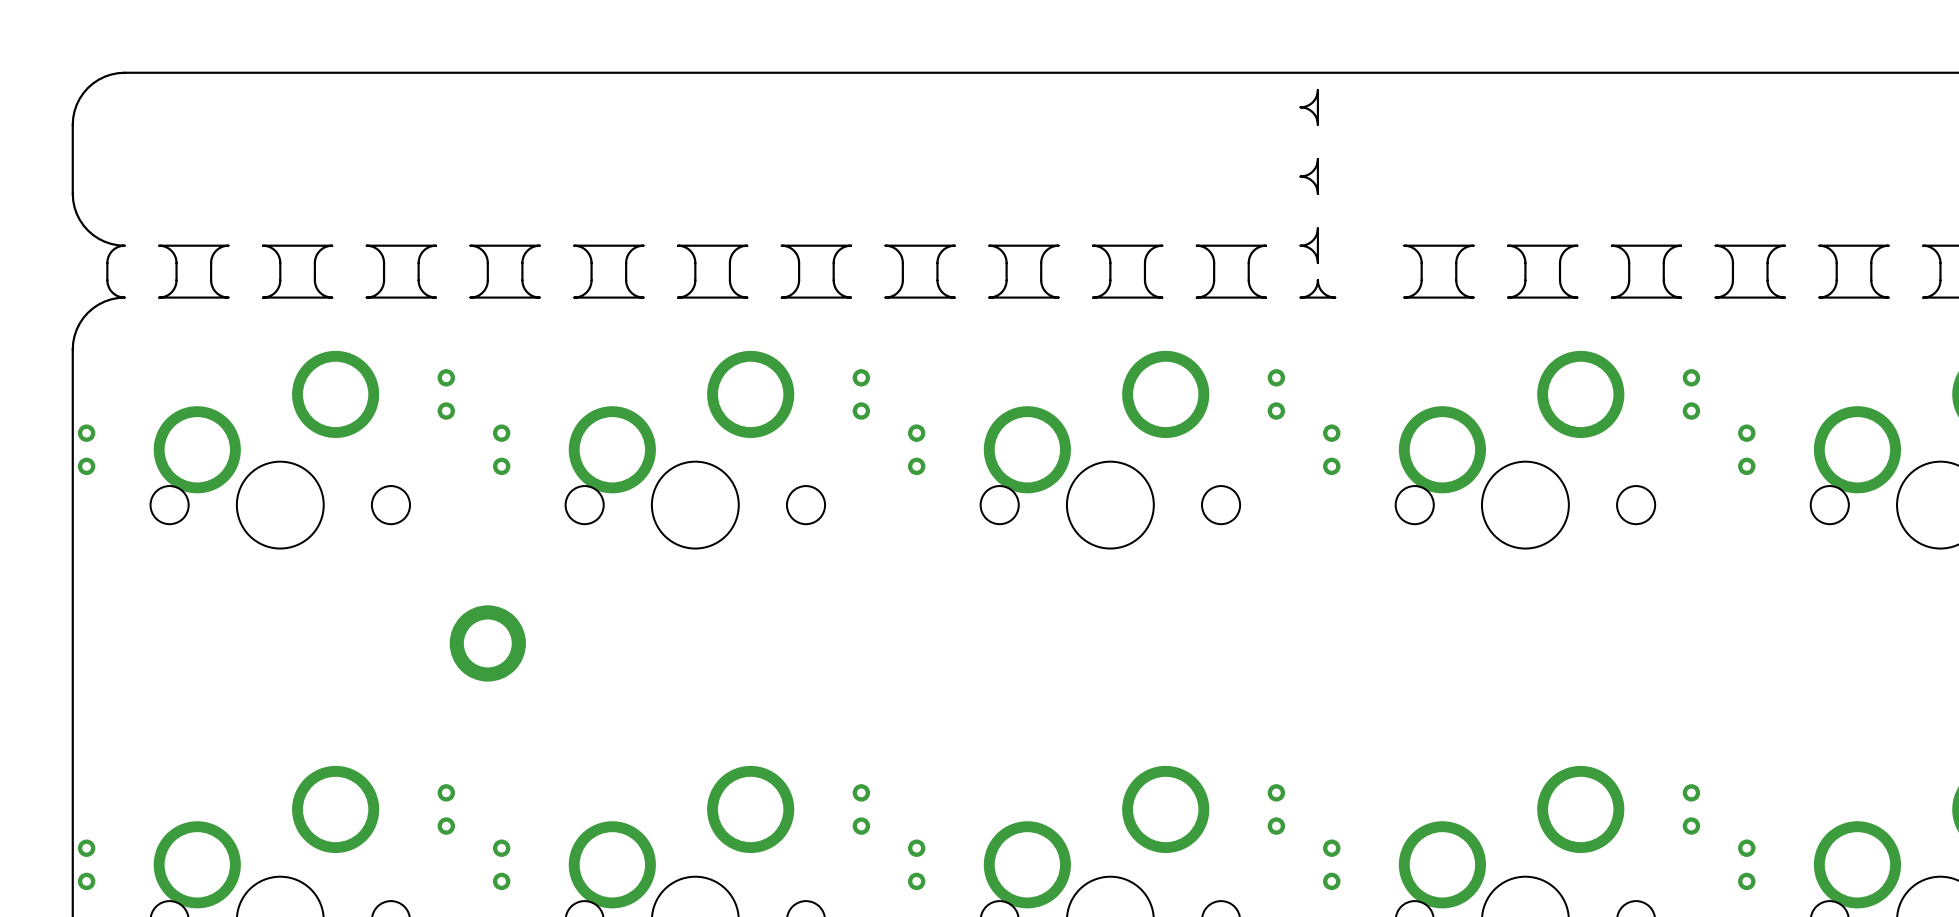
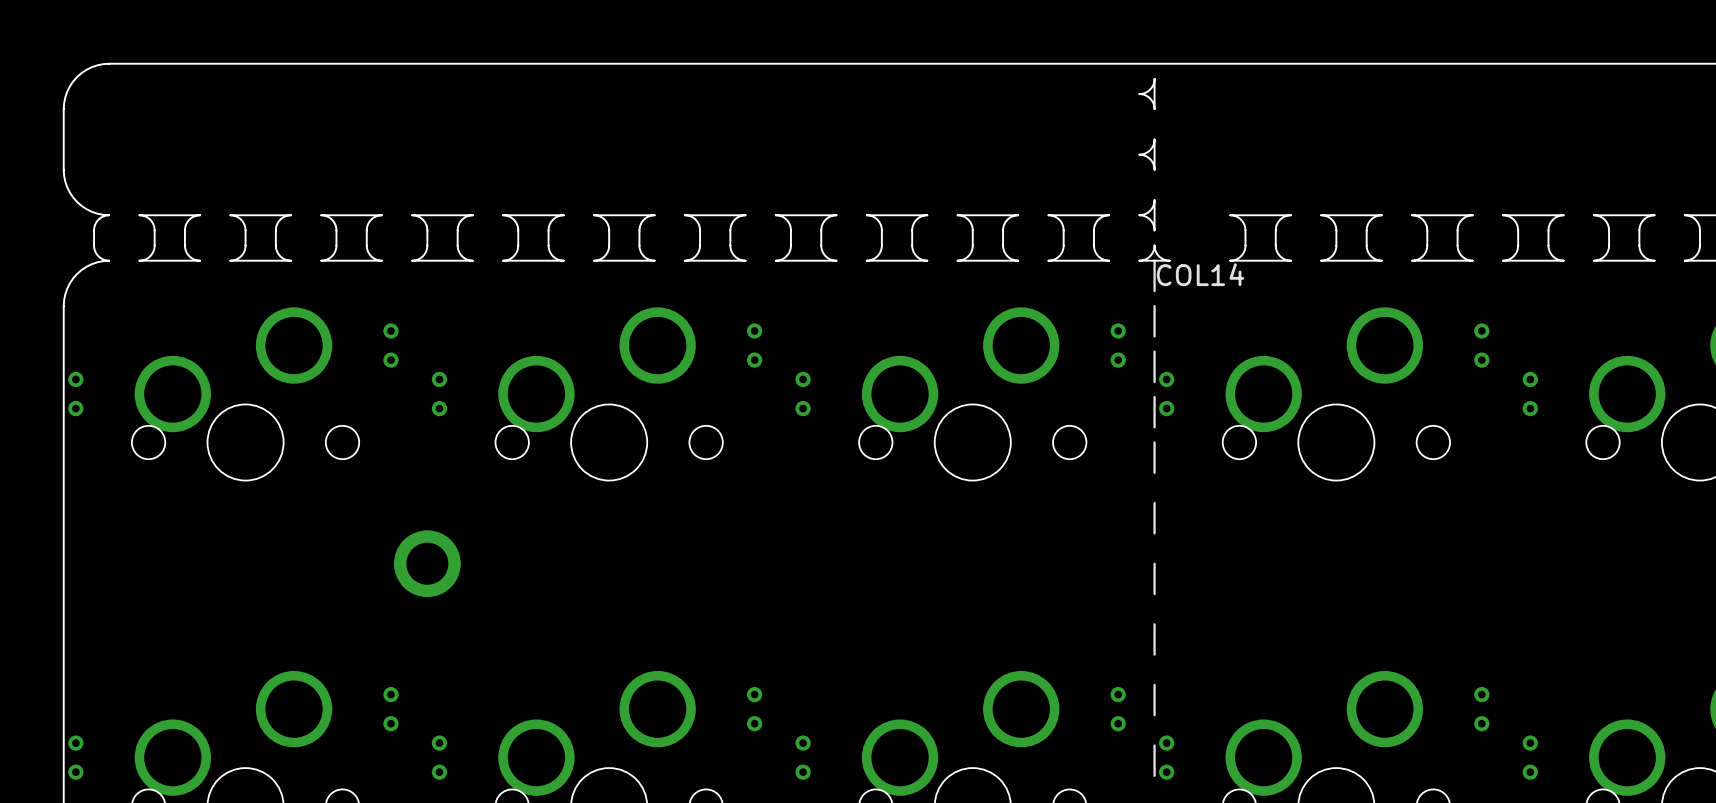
line: none -> (1154, 260) (1154, 291)
text: none -> COL14 (1200, 274)
line: none -> (1154, 306) (1154, 336)
line: none -> (1154, 351) (1154, 381)
line: none -> (1154, 397) (1154, 427)
line: none -> (1154, 442) (1154, 472)
line: none -> (1154, 503) (1154, 533)
line: none -> (1154, 563) (1154, 594)
line: none -> (1154, 624) (1154, 654)
line: none -> (1154, 684) (1154, 715)
line: none -> (1154, 745) (1154, 775)

